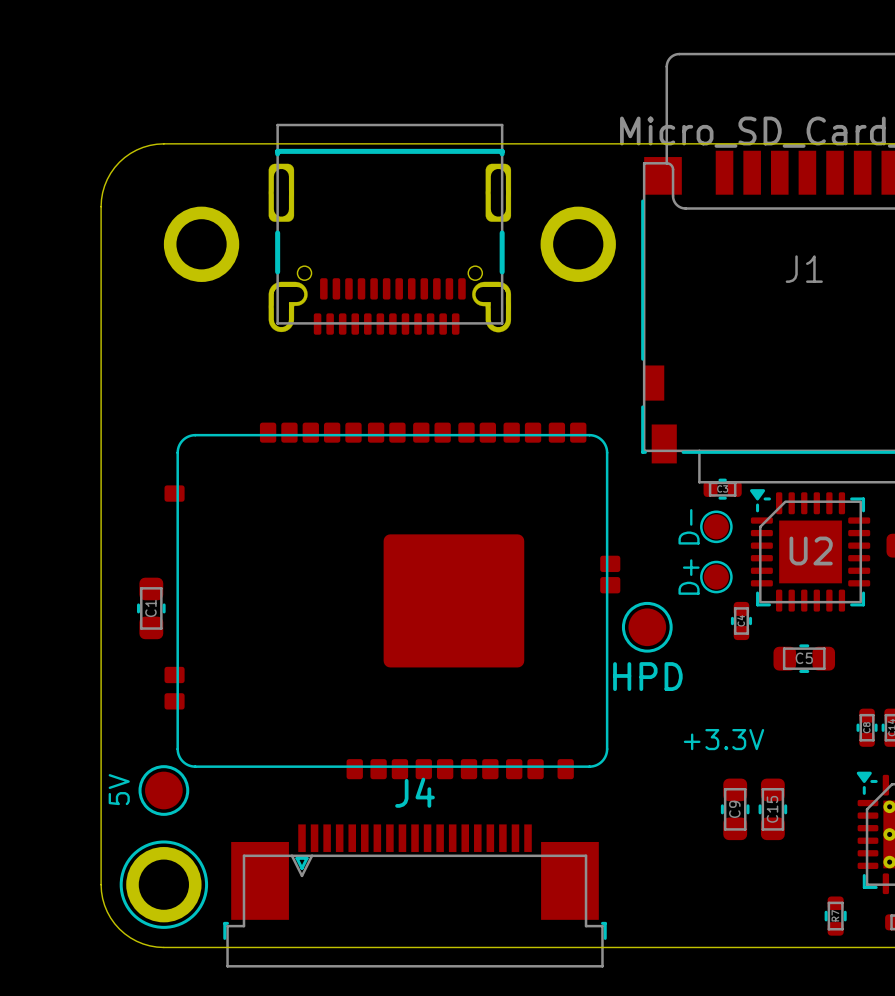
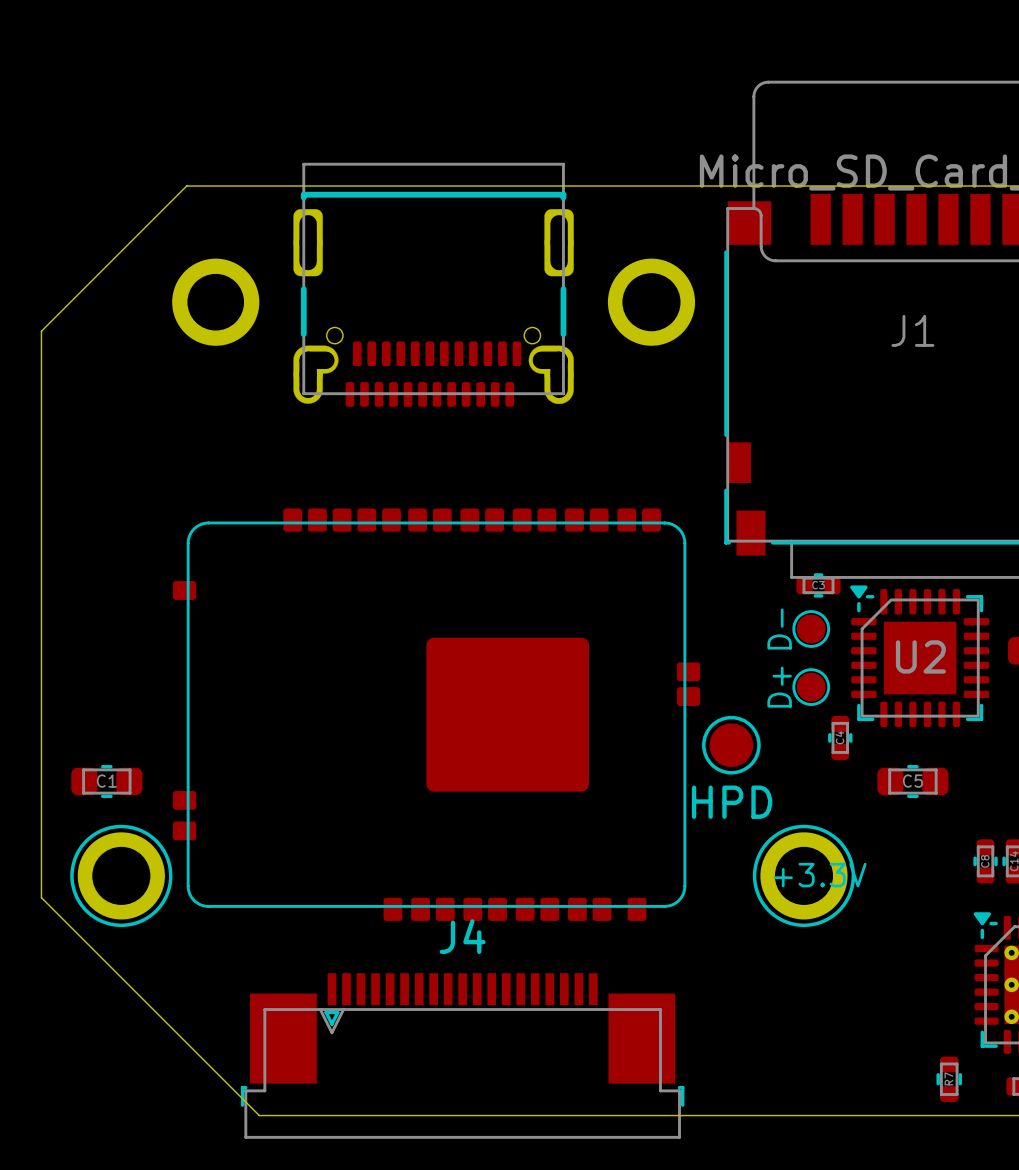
board edge: (176, 143) (149, 145) (136, 150) (124, 157) (114, 167) (107, 179) (101, 199) (101, 891) (107, 911) (114, 923) (130, 937) (143, 943) (163, 947) (239, 947) -> (186, 186) (41, 331) (41, 897) (259, 1115)
round board edge: none -> [185, 272, 246, 332]
C1 rotation: 0° (151, 608) -> 90° clockwise (106, 781)
C1 position: (151, 608) -> (106, 781)
part: none -> (803, 875)
part: 5V (163, 790) -> none
C9: (735, 809) -> none
C15: (772, 809) -> none
part position: (163, 884) -> (121, 875)

